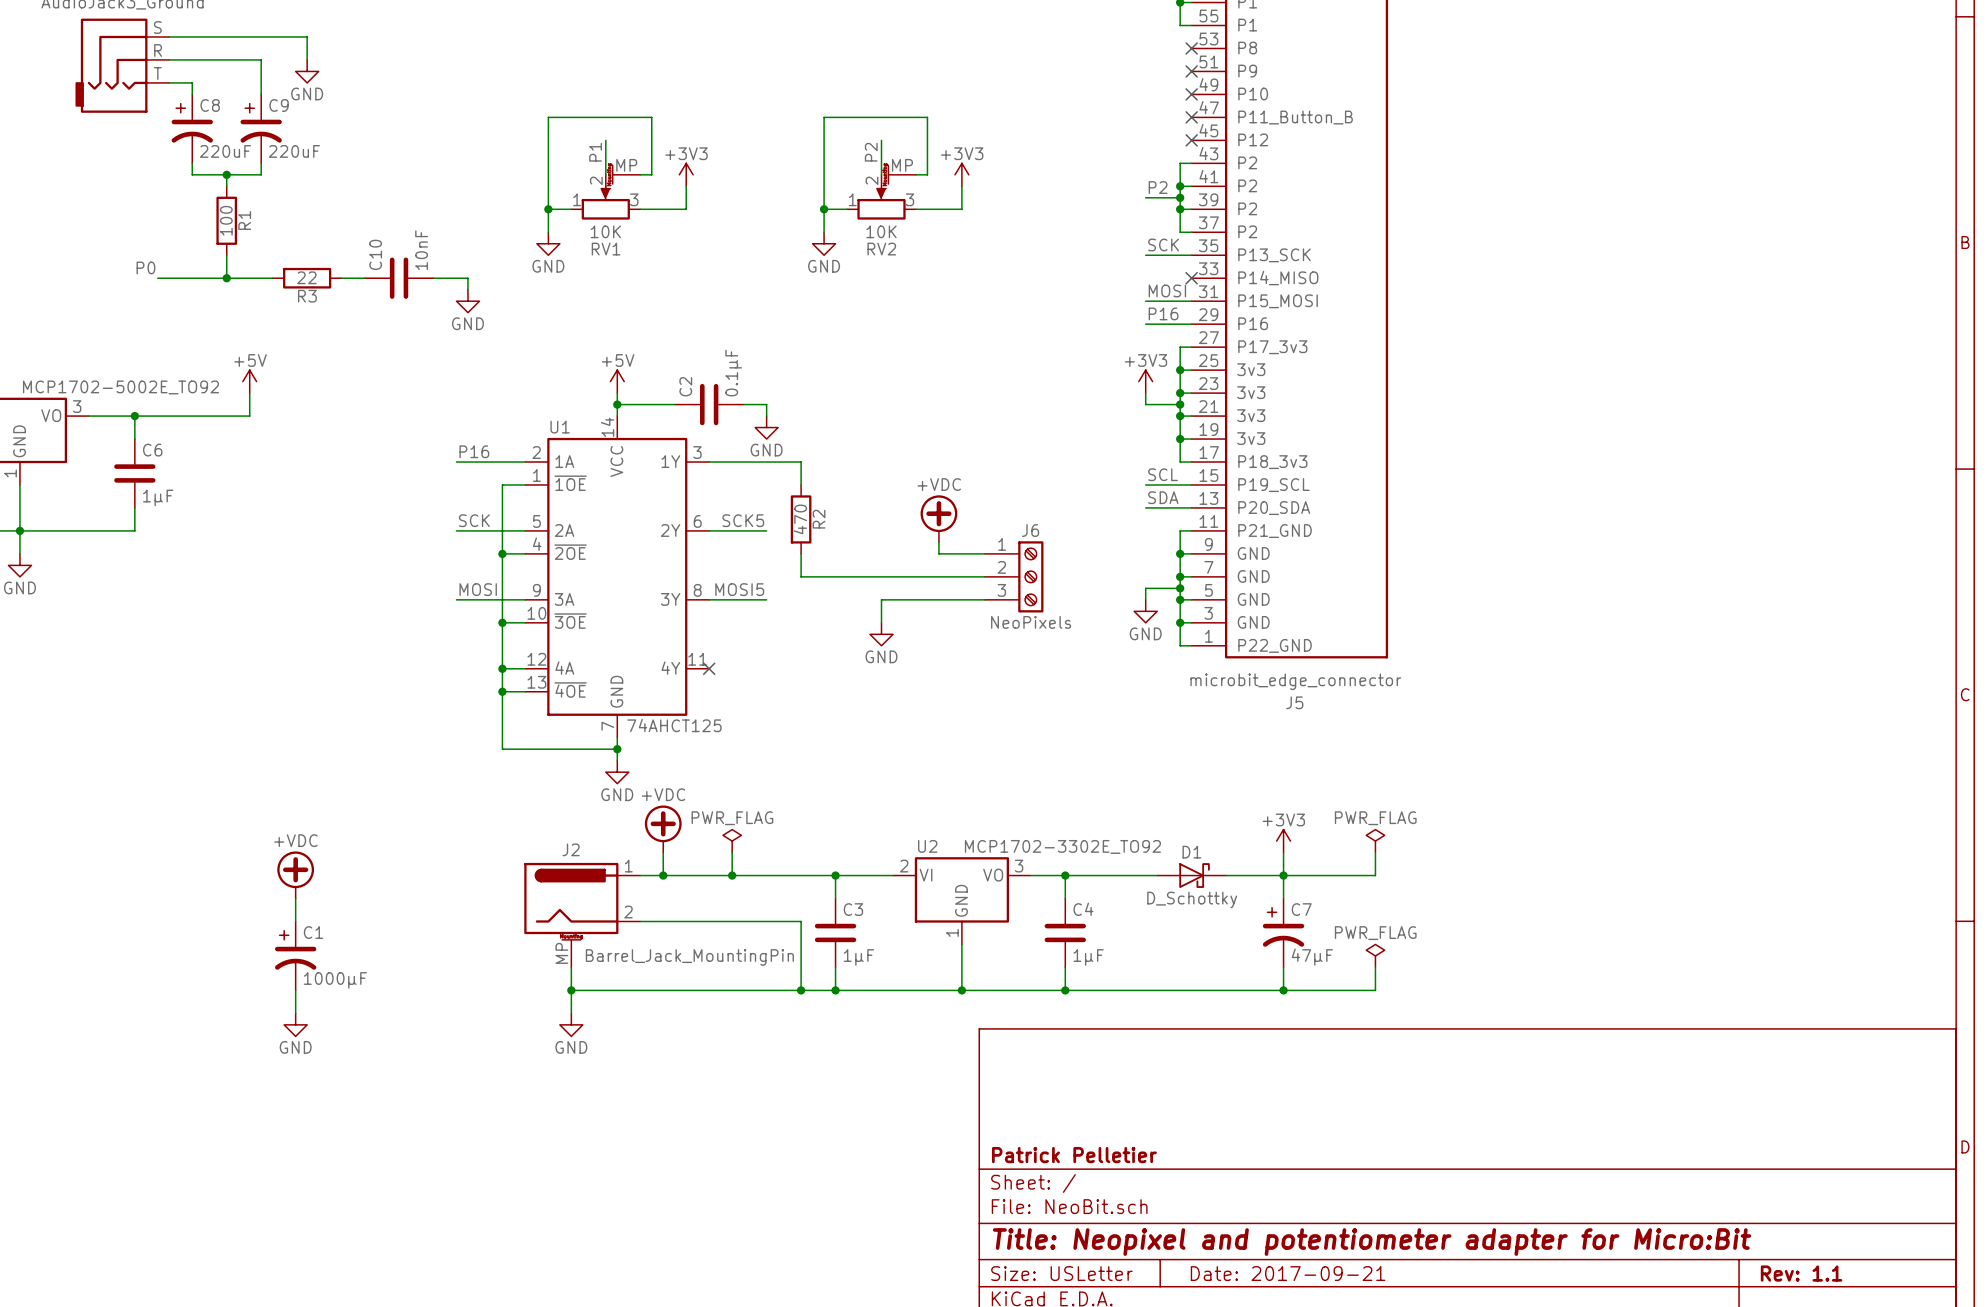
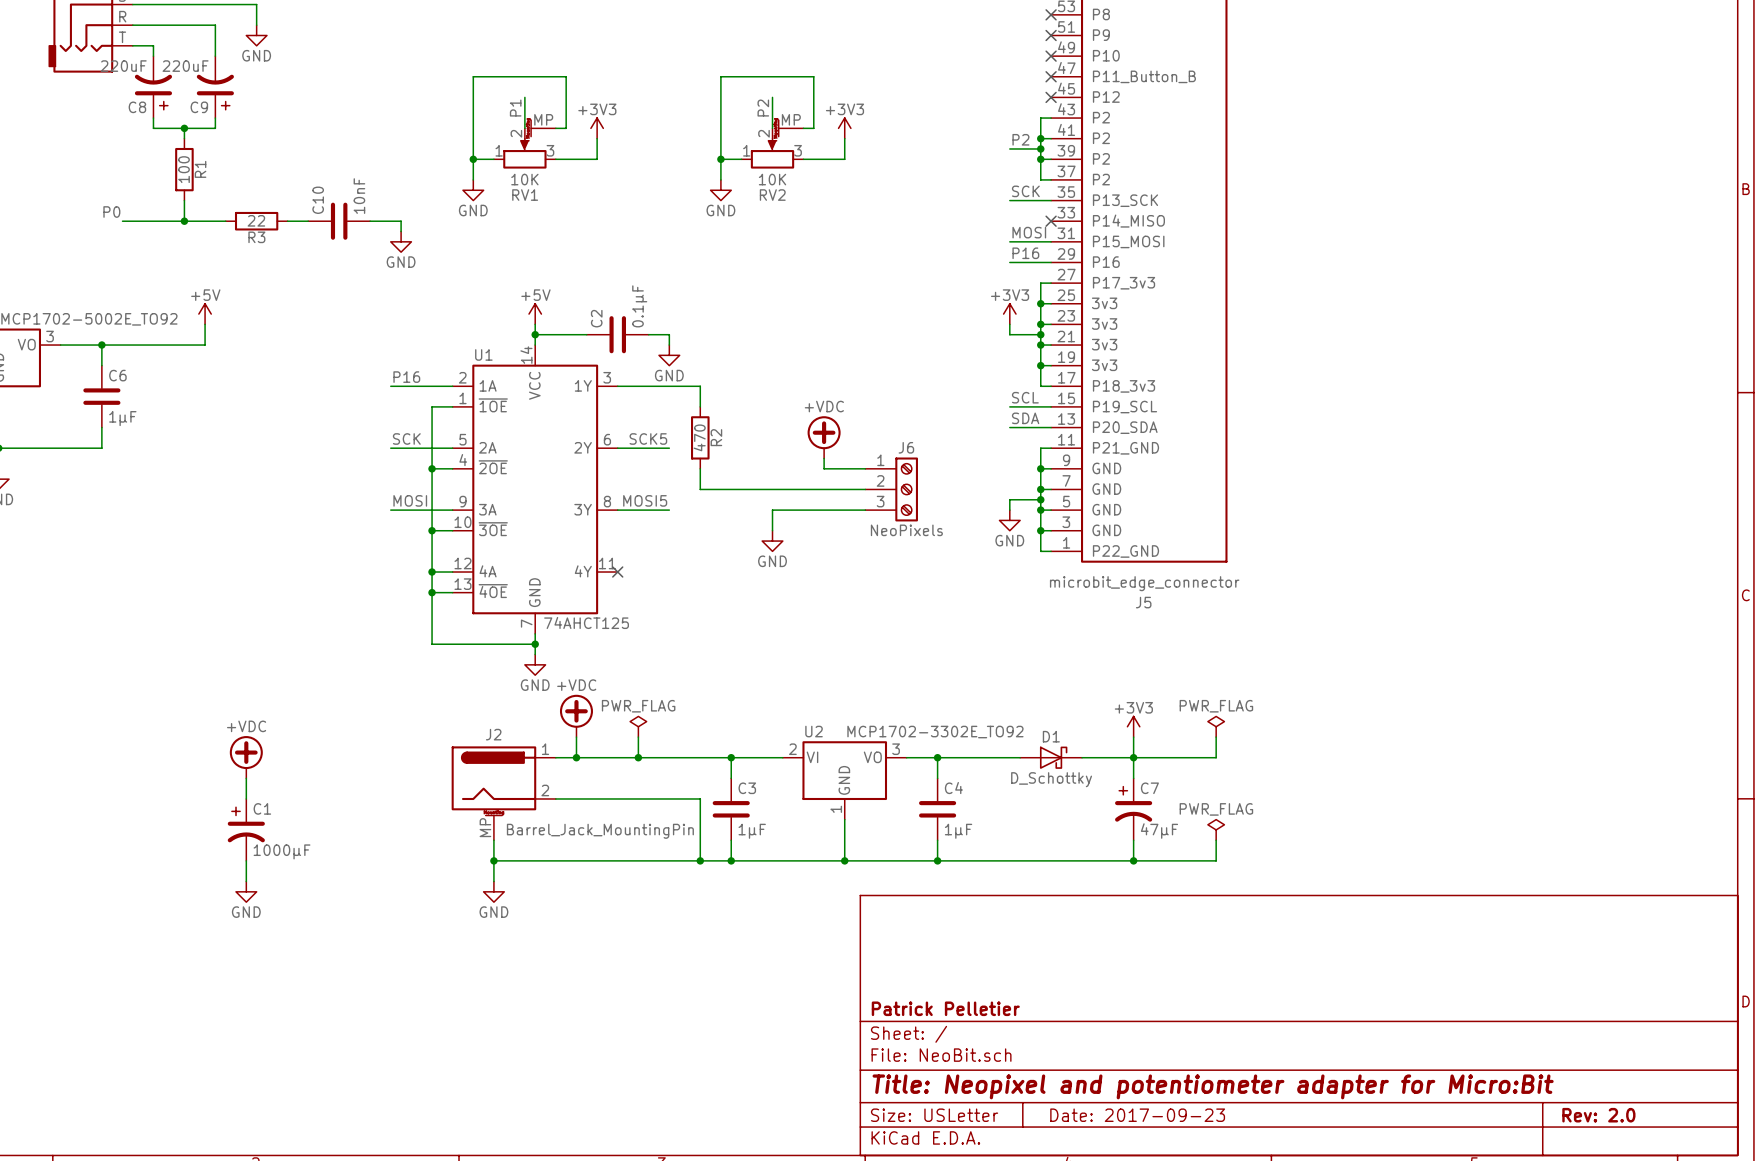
C8 rotation: 0° (192, 123) -> 180° (153, 92)
C9 rotation: 0° (261, 123) -> 180° (215, 92)
title block: Date: 2017-09-21 (1288, 1273) -> Date: 2017-09-23 (1137, 1115)
title block: Rev: 1.1 (1801, 1273) -> Rev: 2.0 (1598, 1115)

